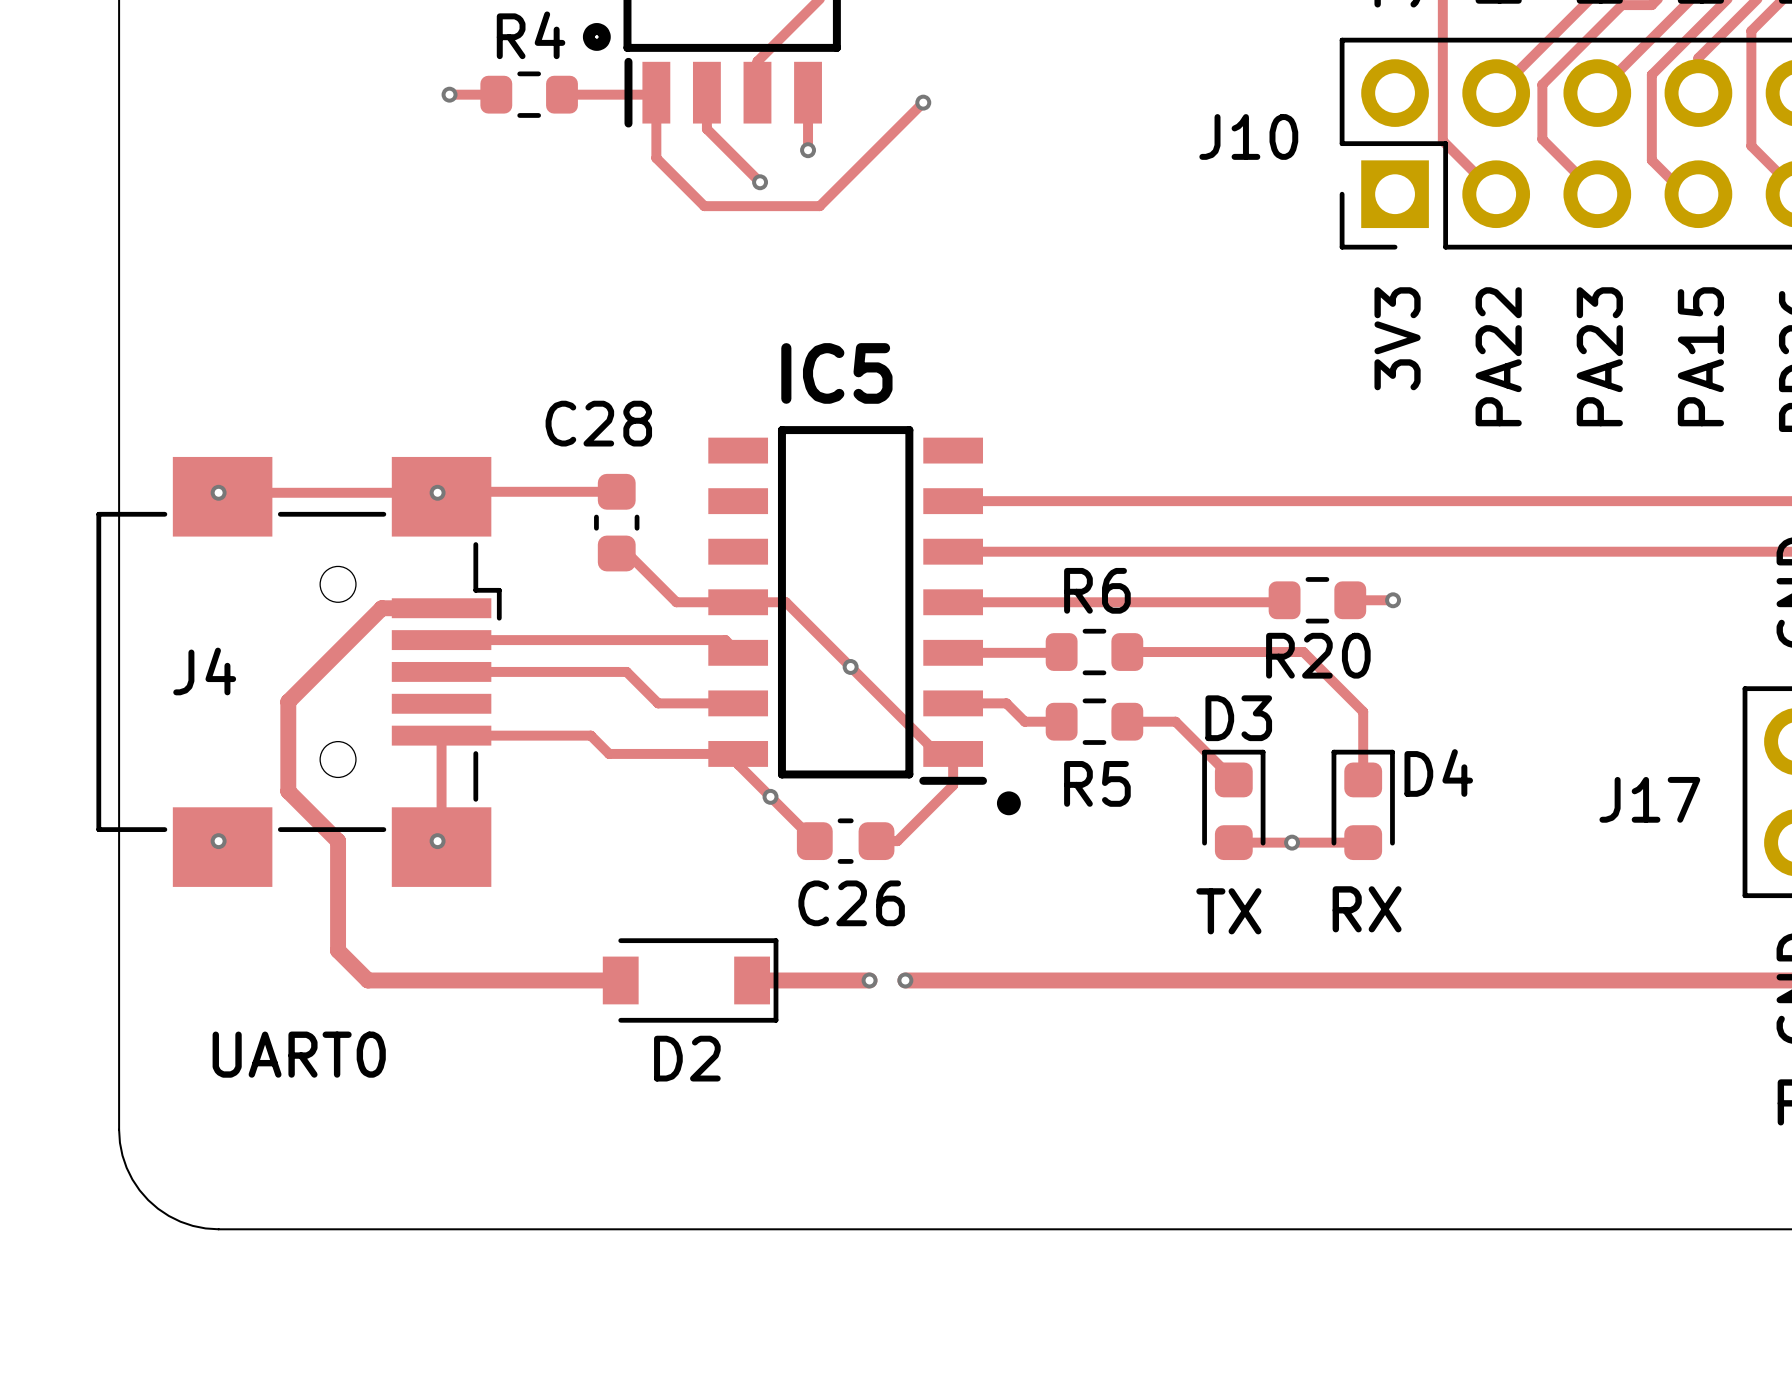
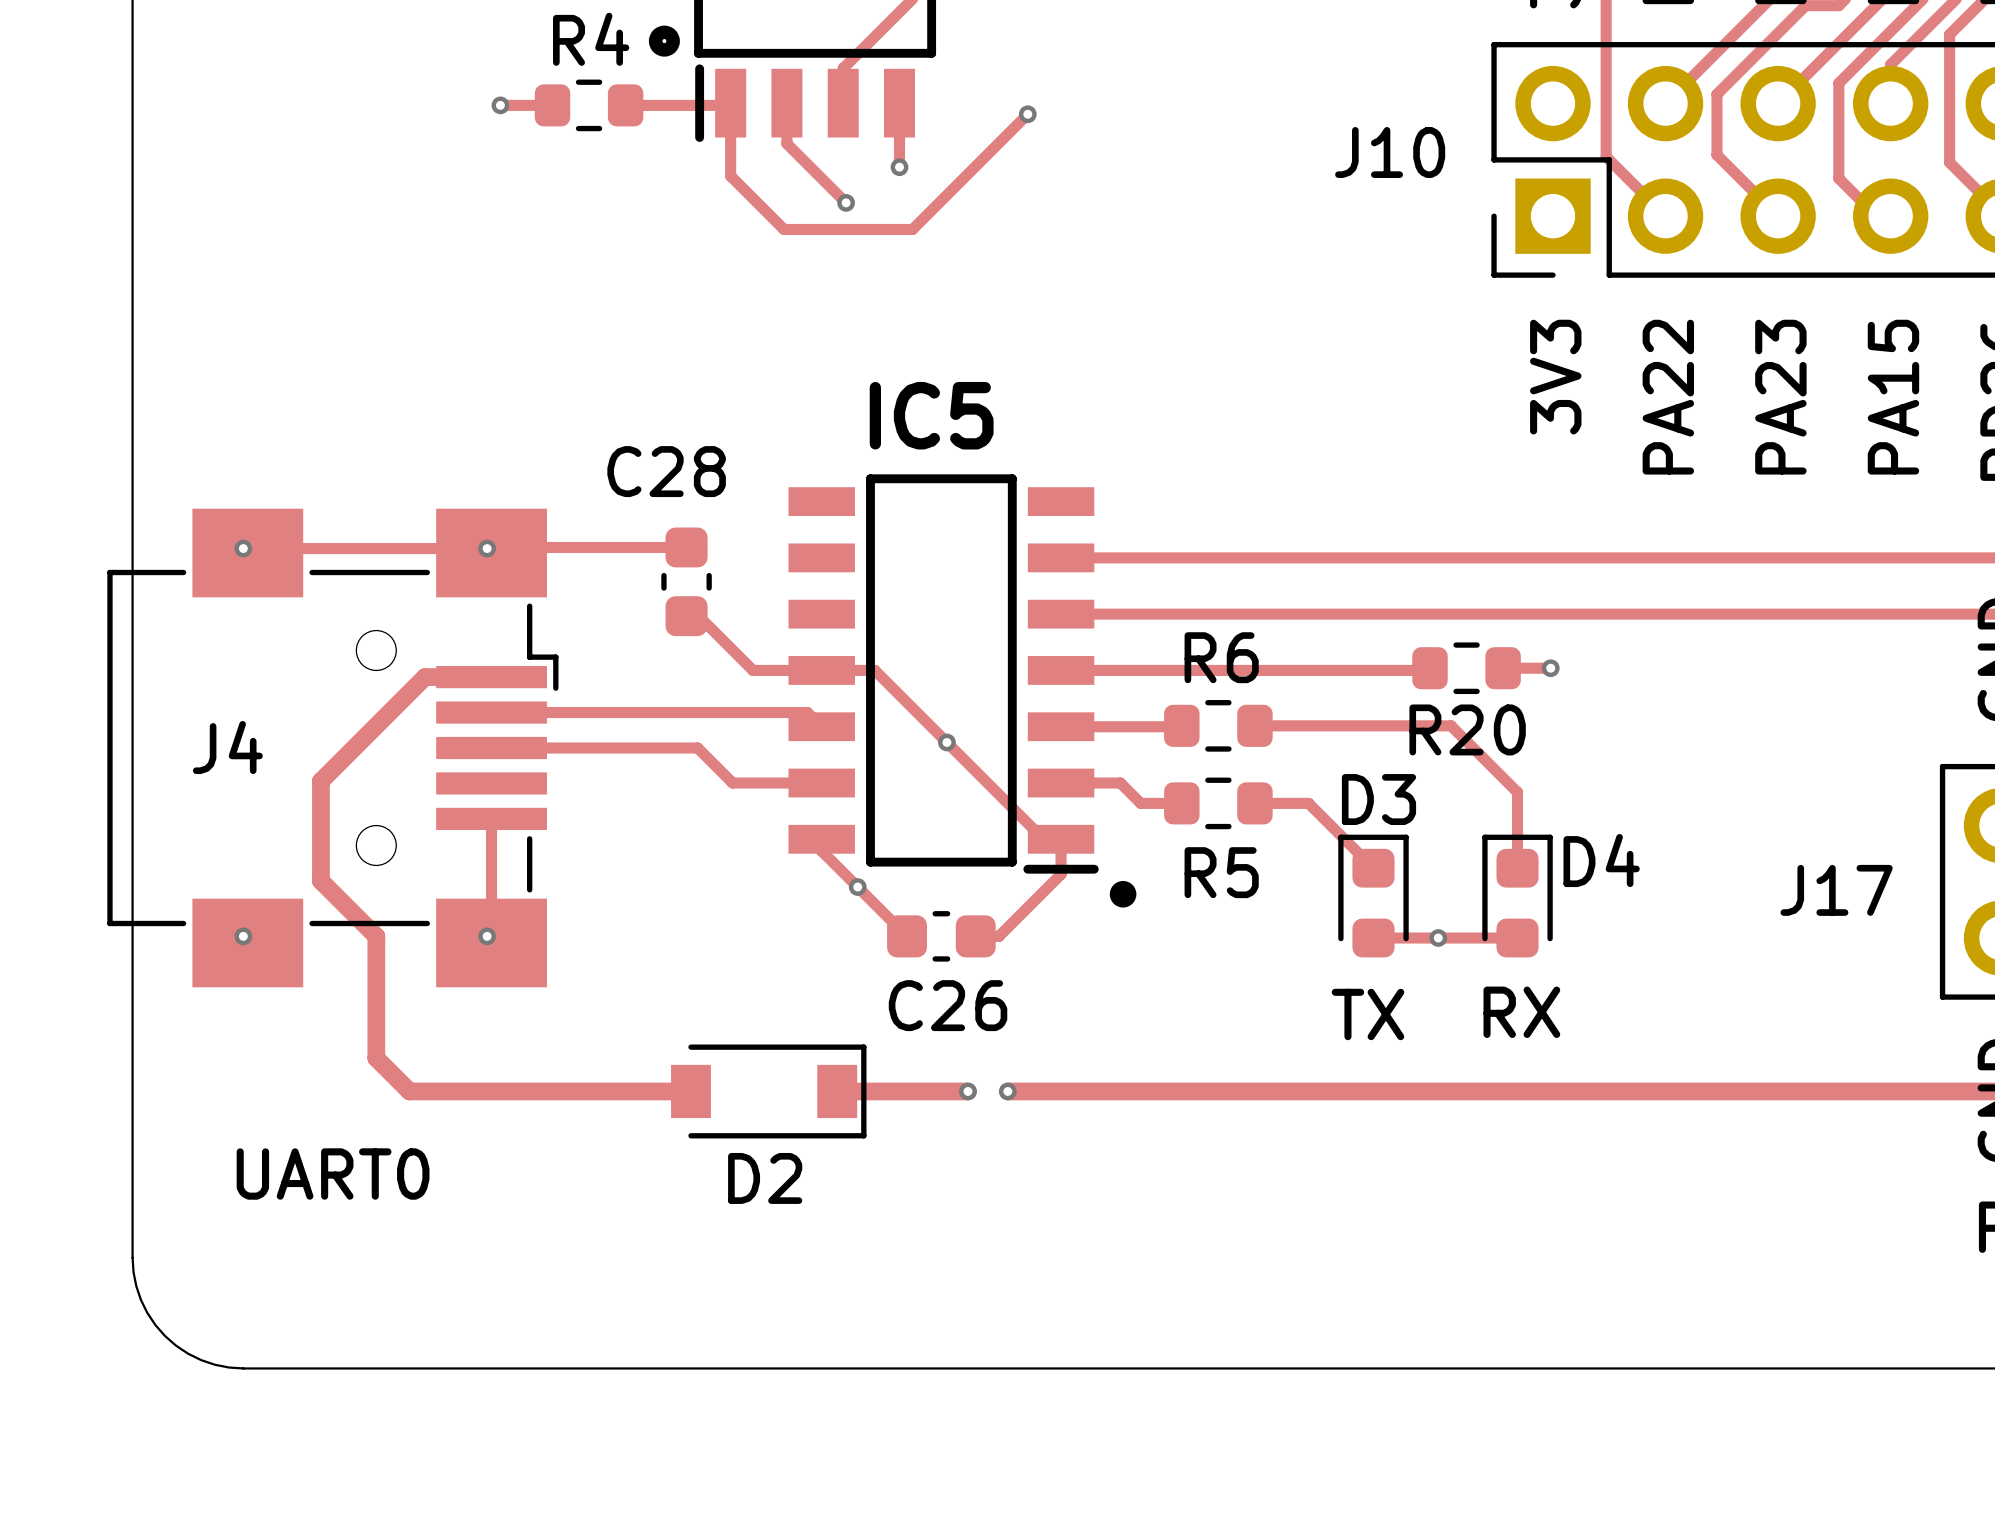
track: (441, 735) (590, 735) (609, 753) (738, 753) -> none

